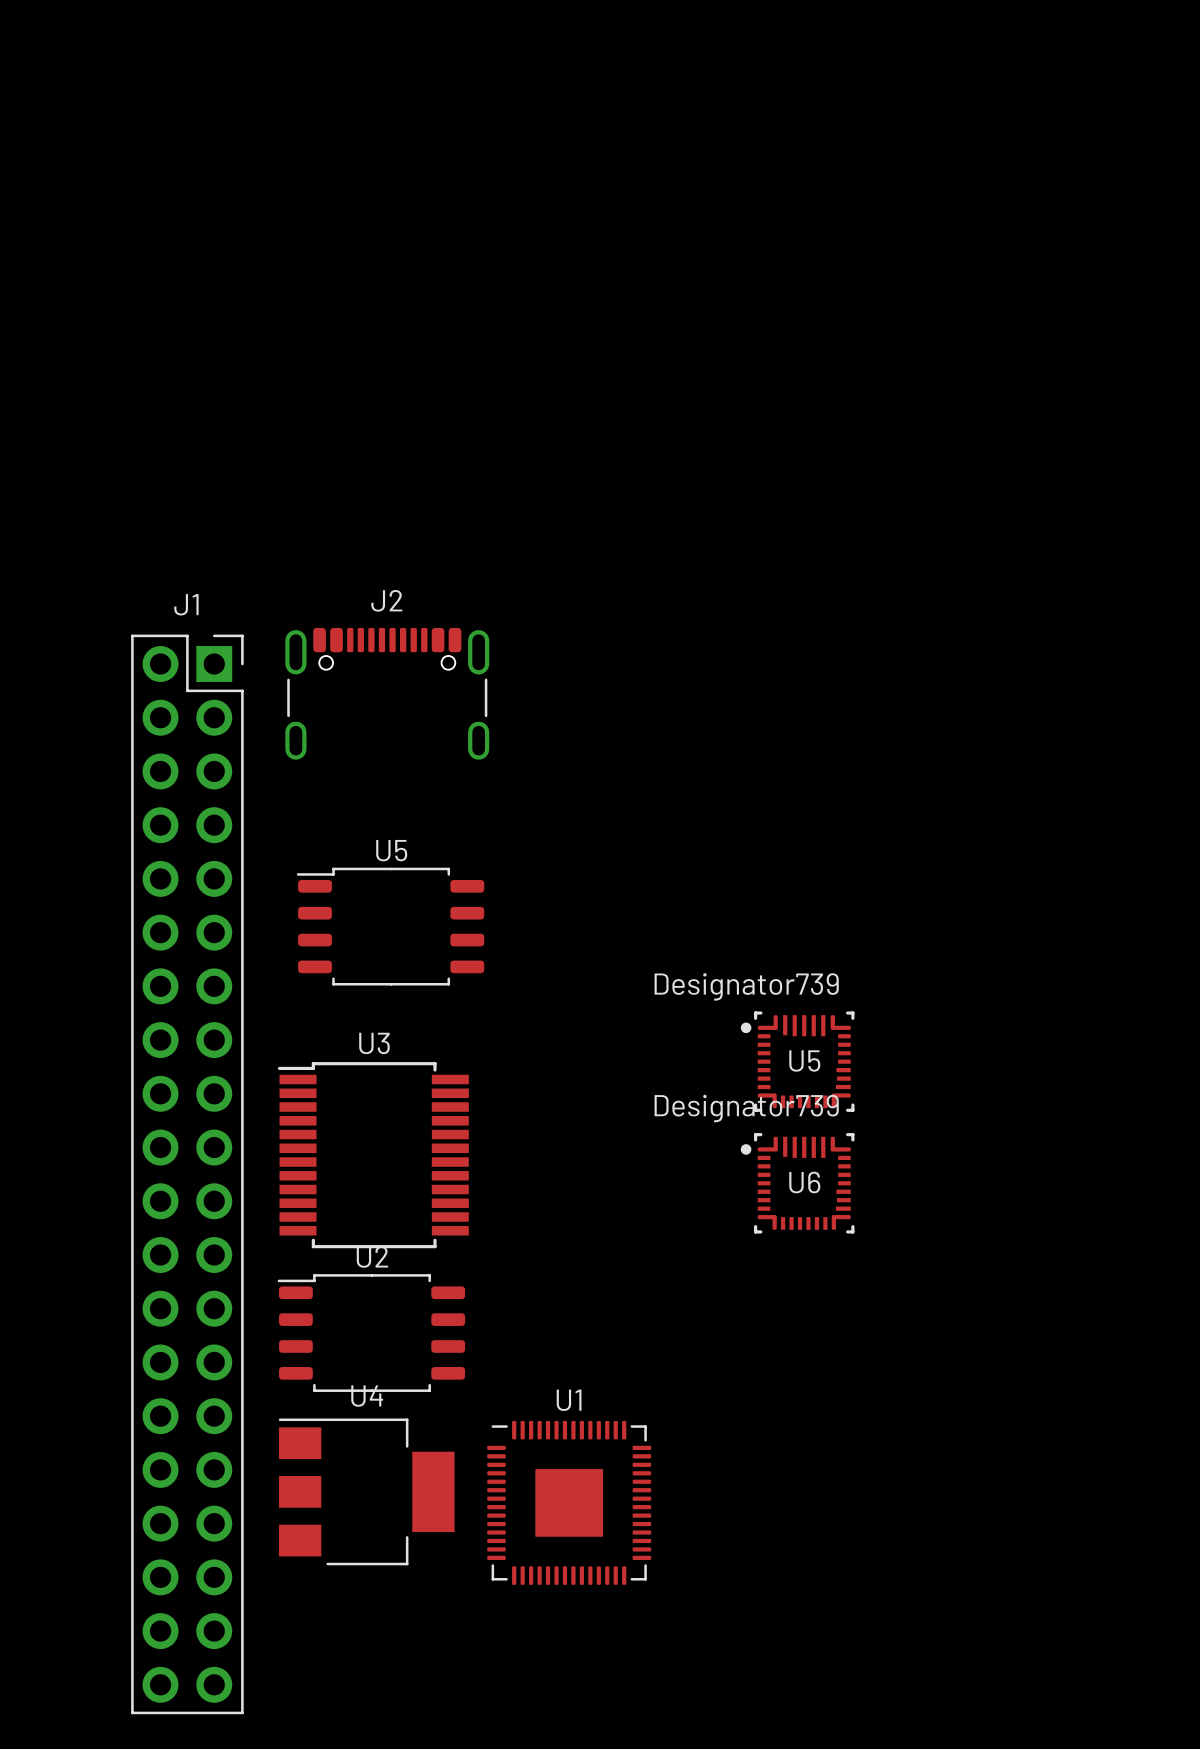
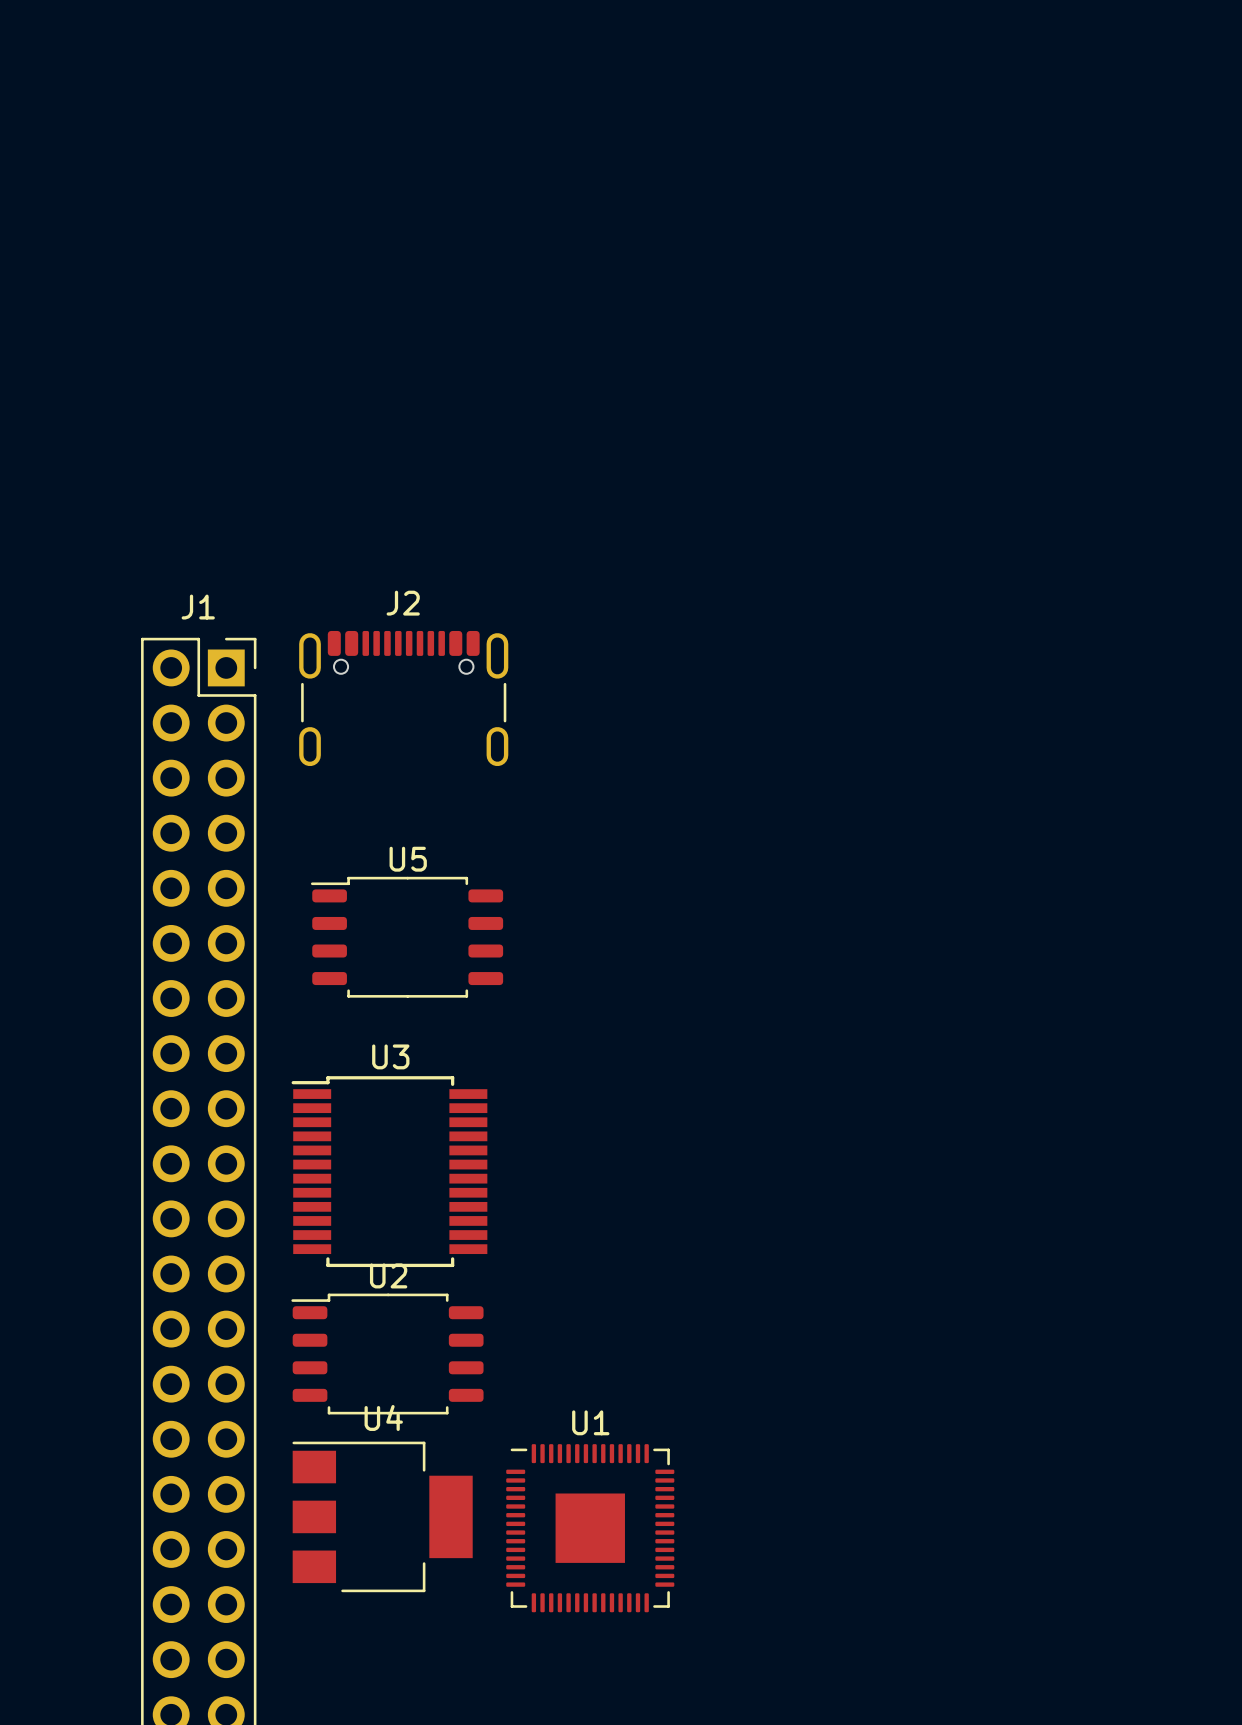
U5: (797, 1061) -> none
U6: (797, 1183) -> none

